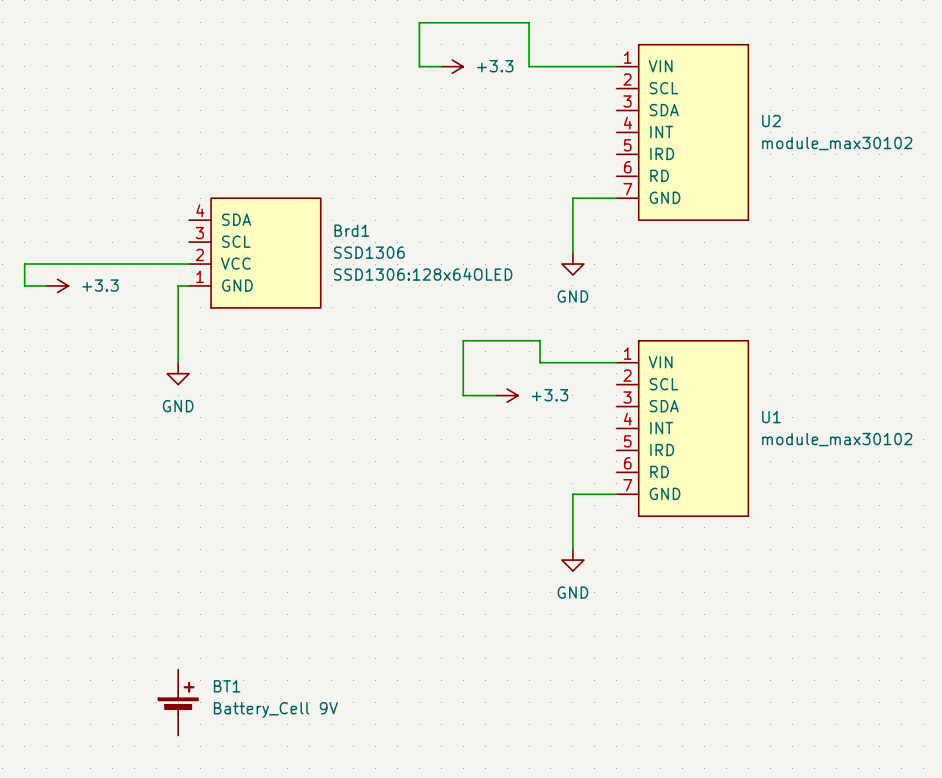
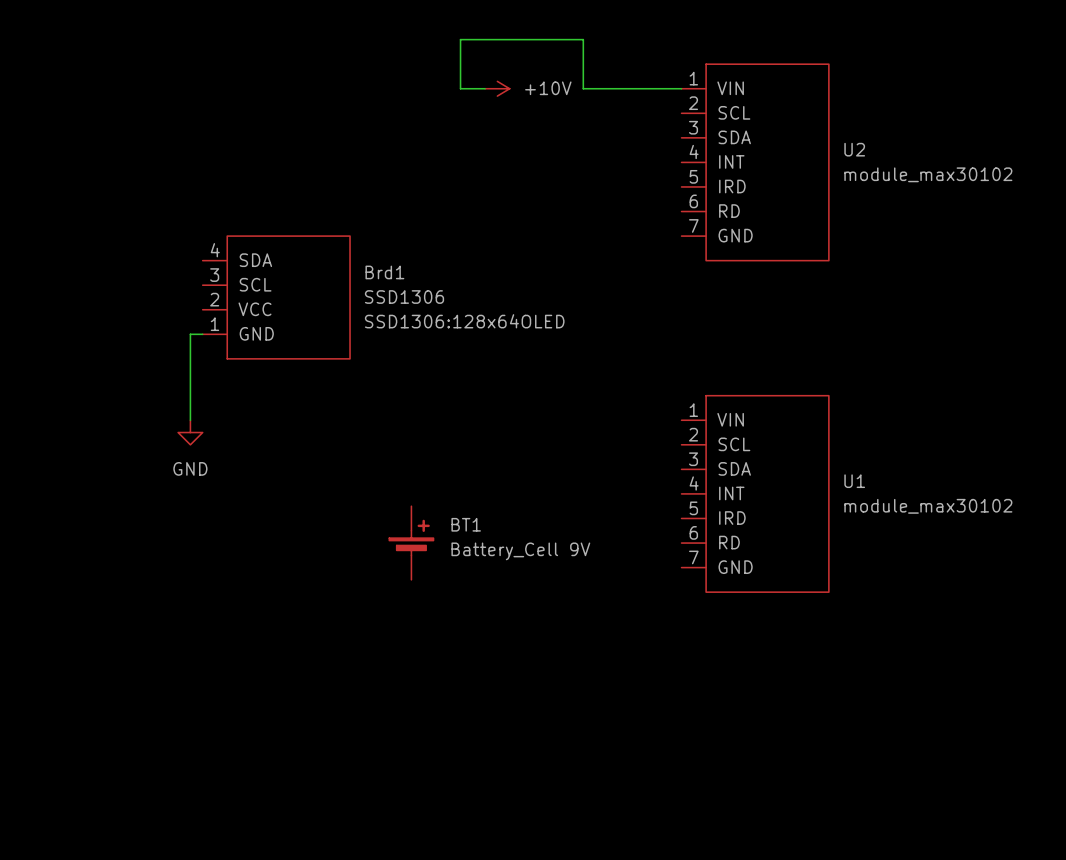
power symbol: +3.3 (452, 66) -> +10V (497, 88)
wire: (616, 198) (572, 198) (572, 253) -> none
wire: (189, 264) (24, 264) (24, 285) (46, 285) -> none
power symbol: GND (572, 264) -> none
power symbol: +3.3 (57, 285) -> none
wire: (616, 362) (540, 362) (540, 340) (463, 340) (463, 395) (496, 395) -> none
power symbol: +3.3 (507, 395) -> none
wire: (616, 494) (572, 494) (572, 549) -> none
power symbol: GND (572, 560) -> none
BT1 position: (178, 702) -> (411, 543)

